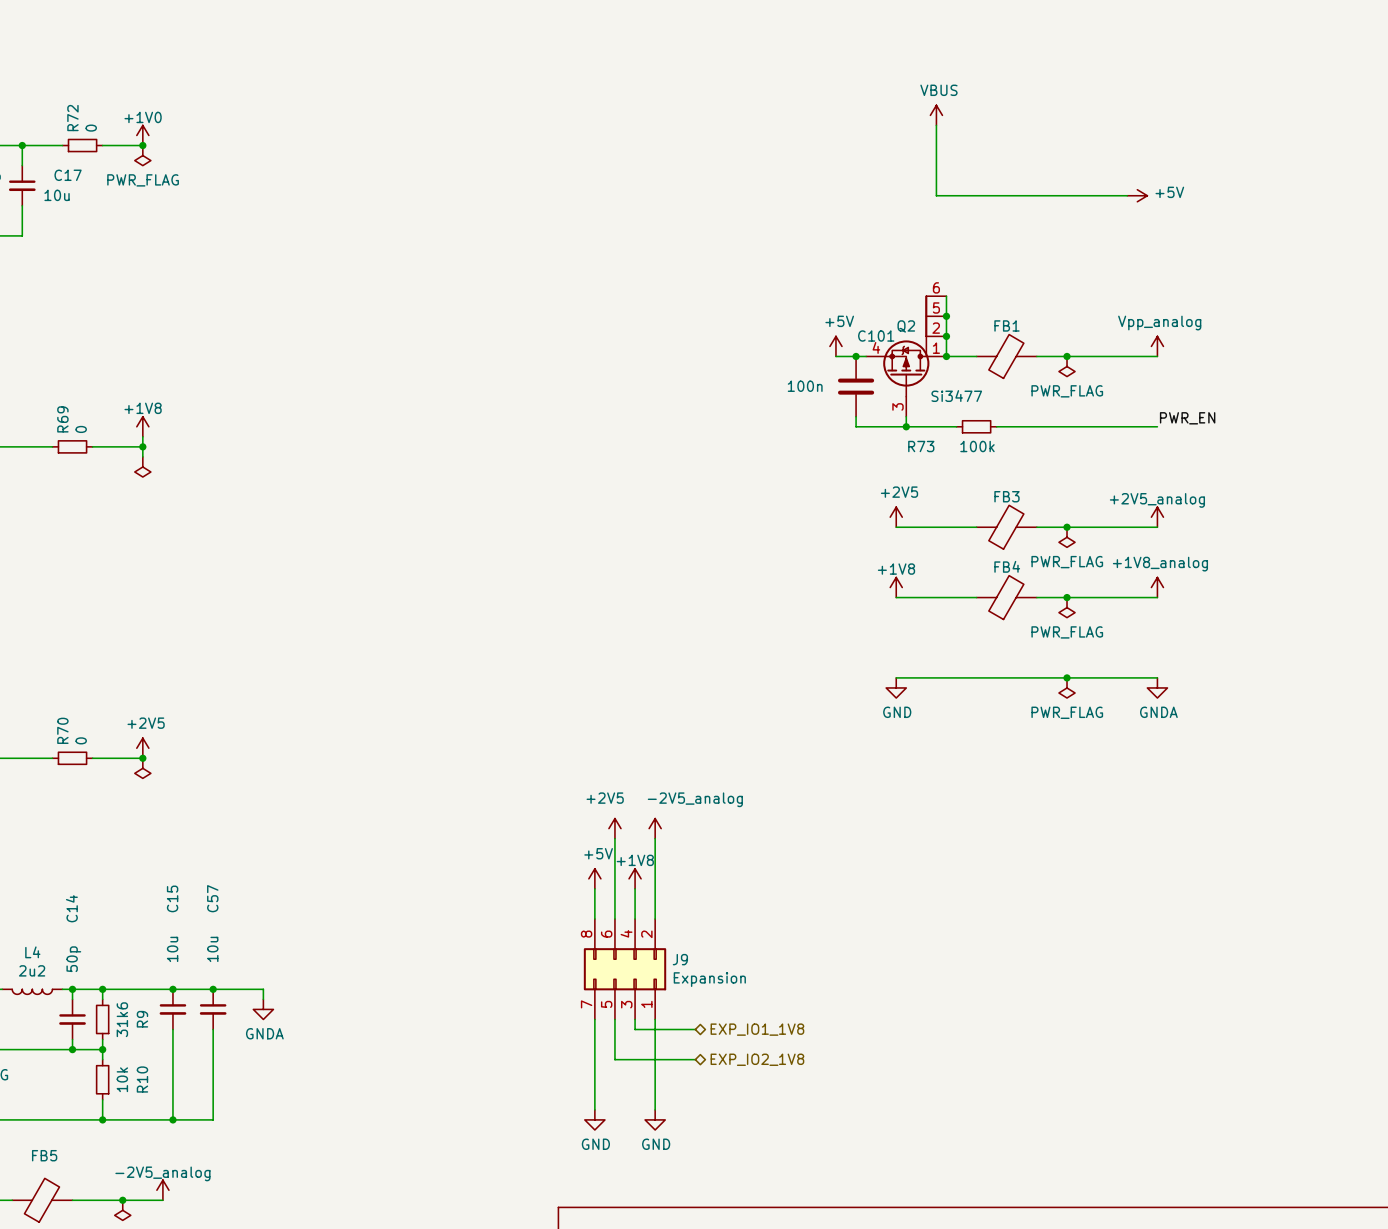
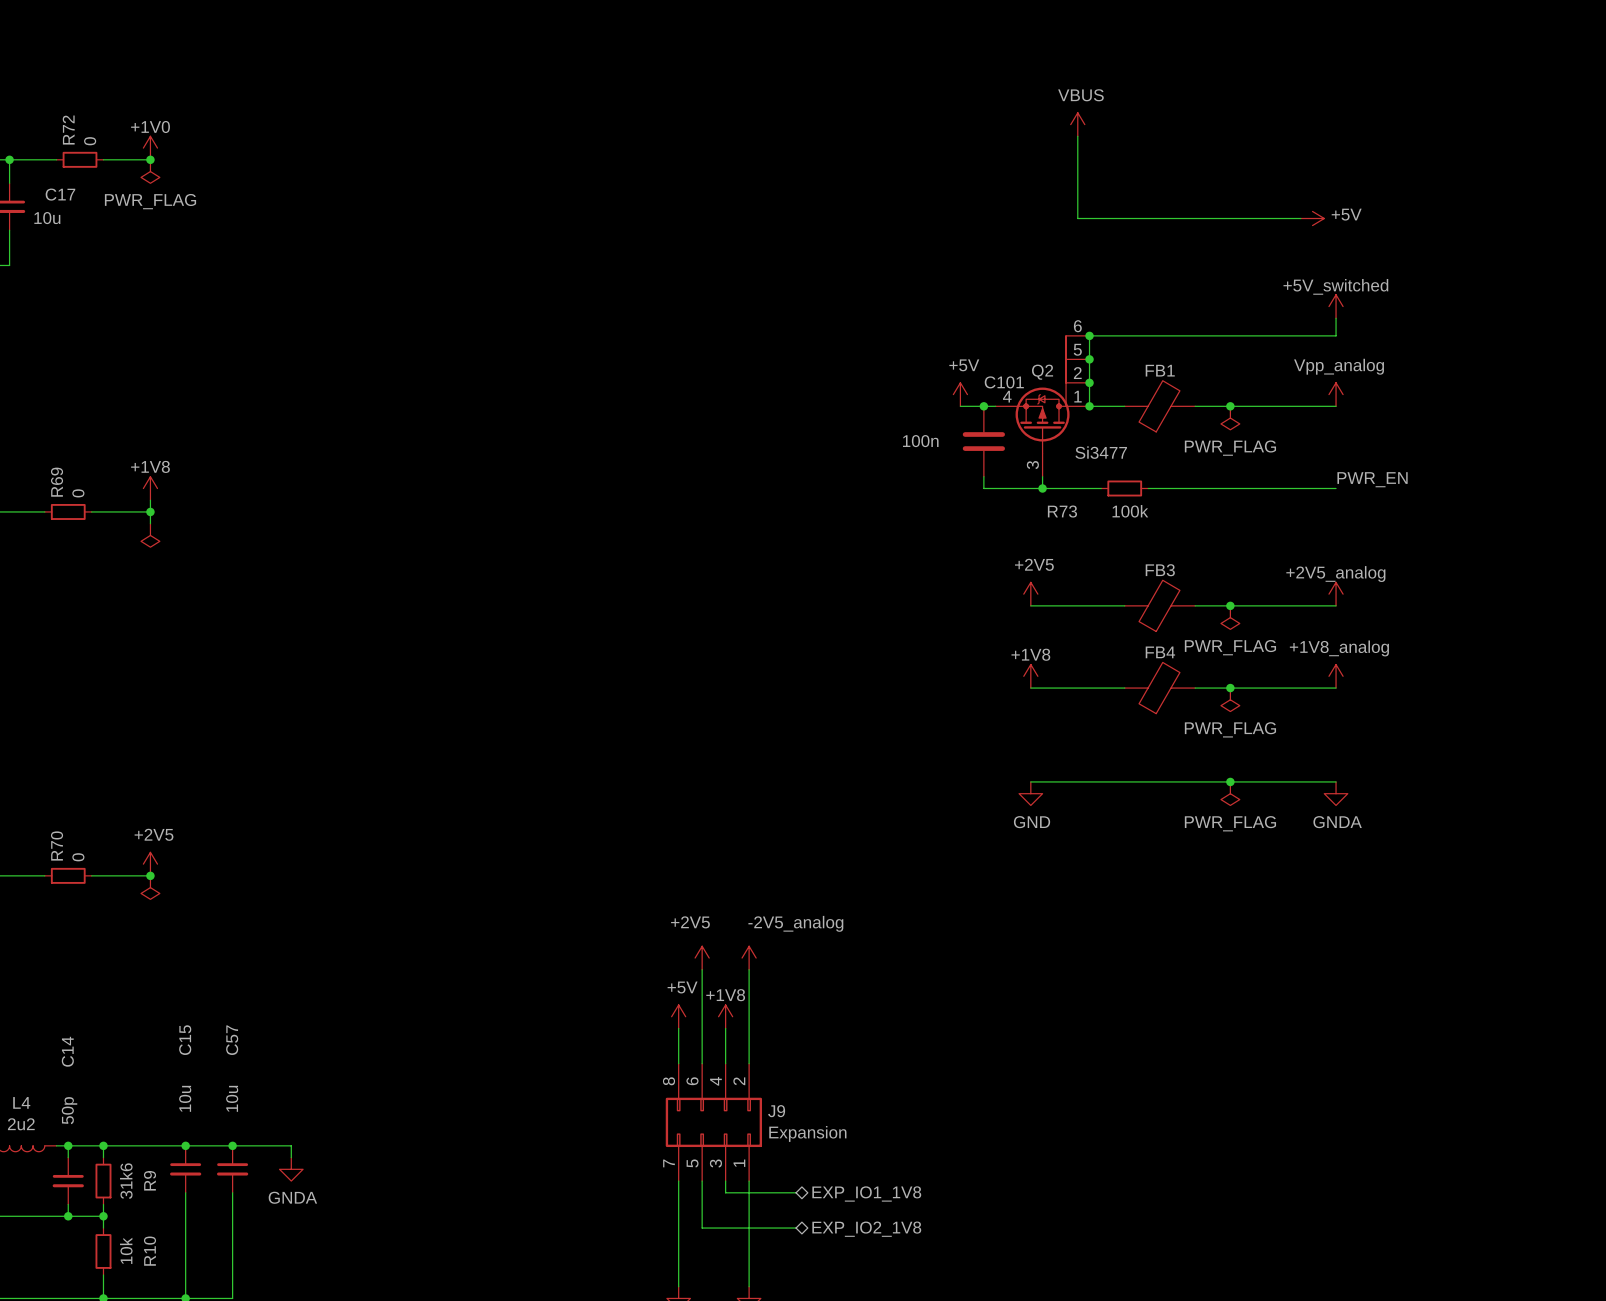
power symbol: none -> +5V_switched (1336, 306)
wire: none -> (1336, 318) (1336, 335) (1089, 335)
junction: none -> (1089, 335)

